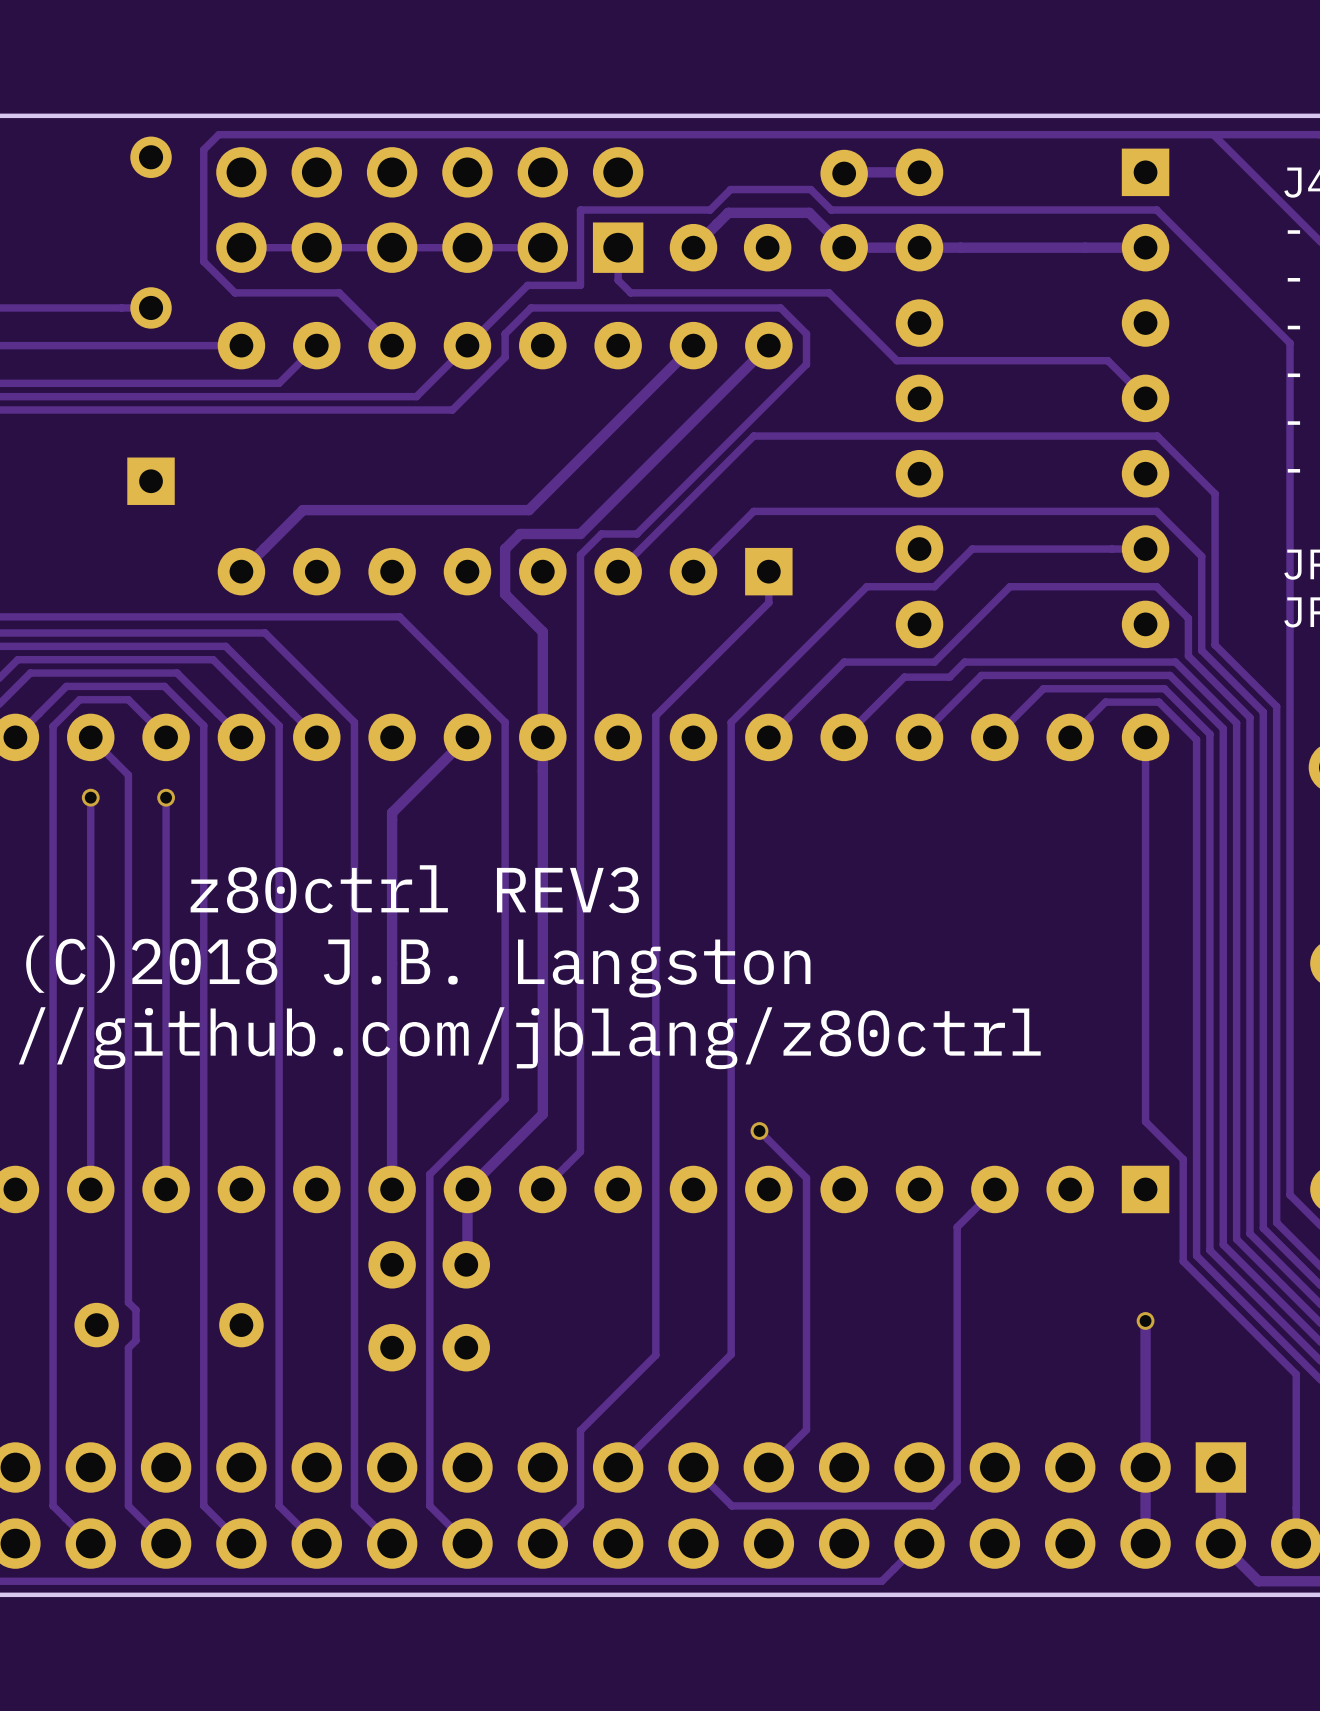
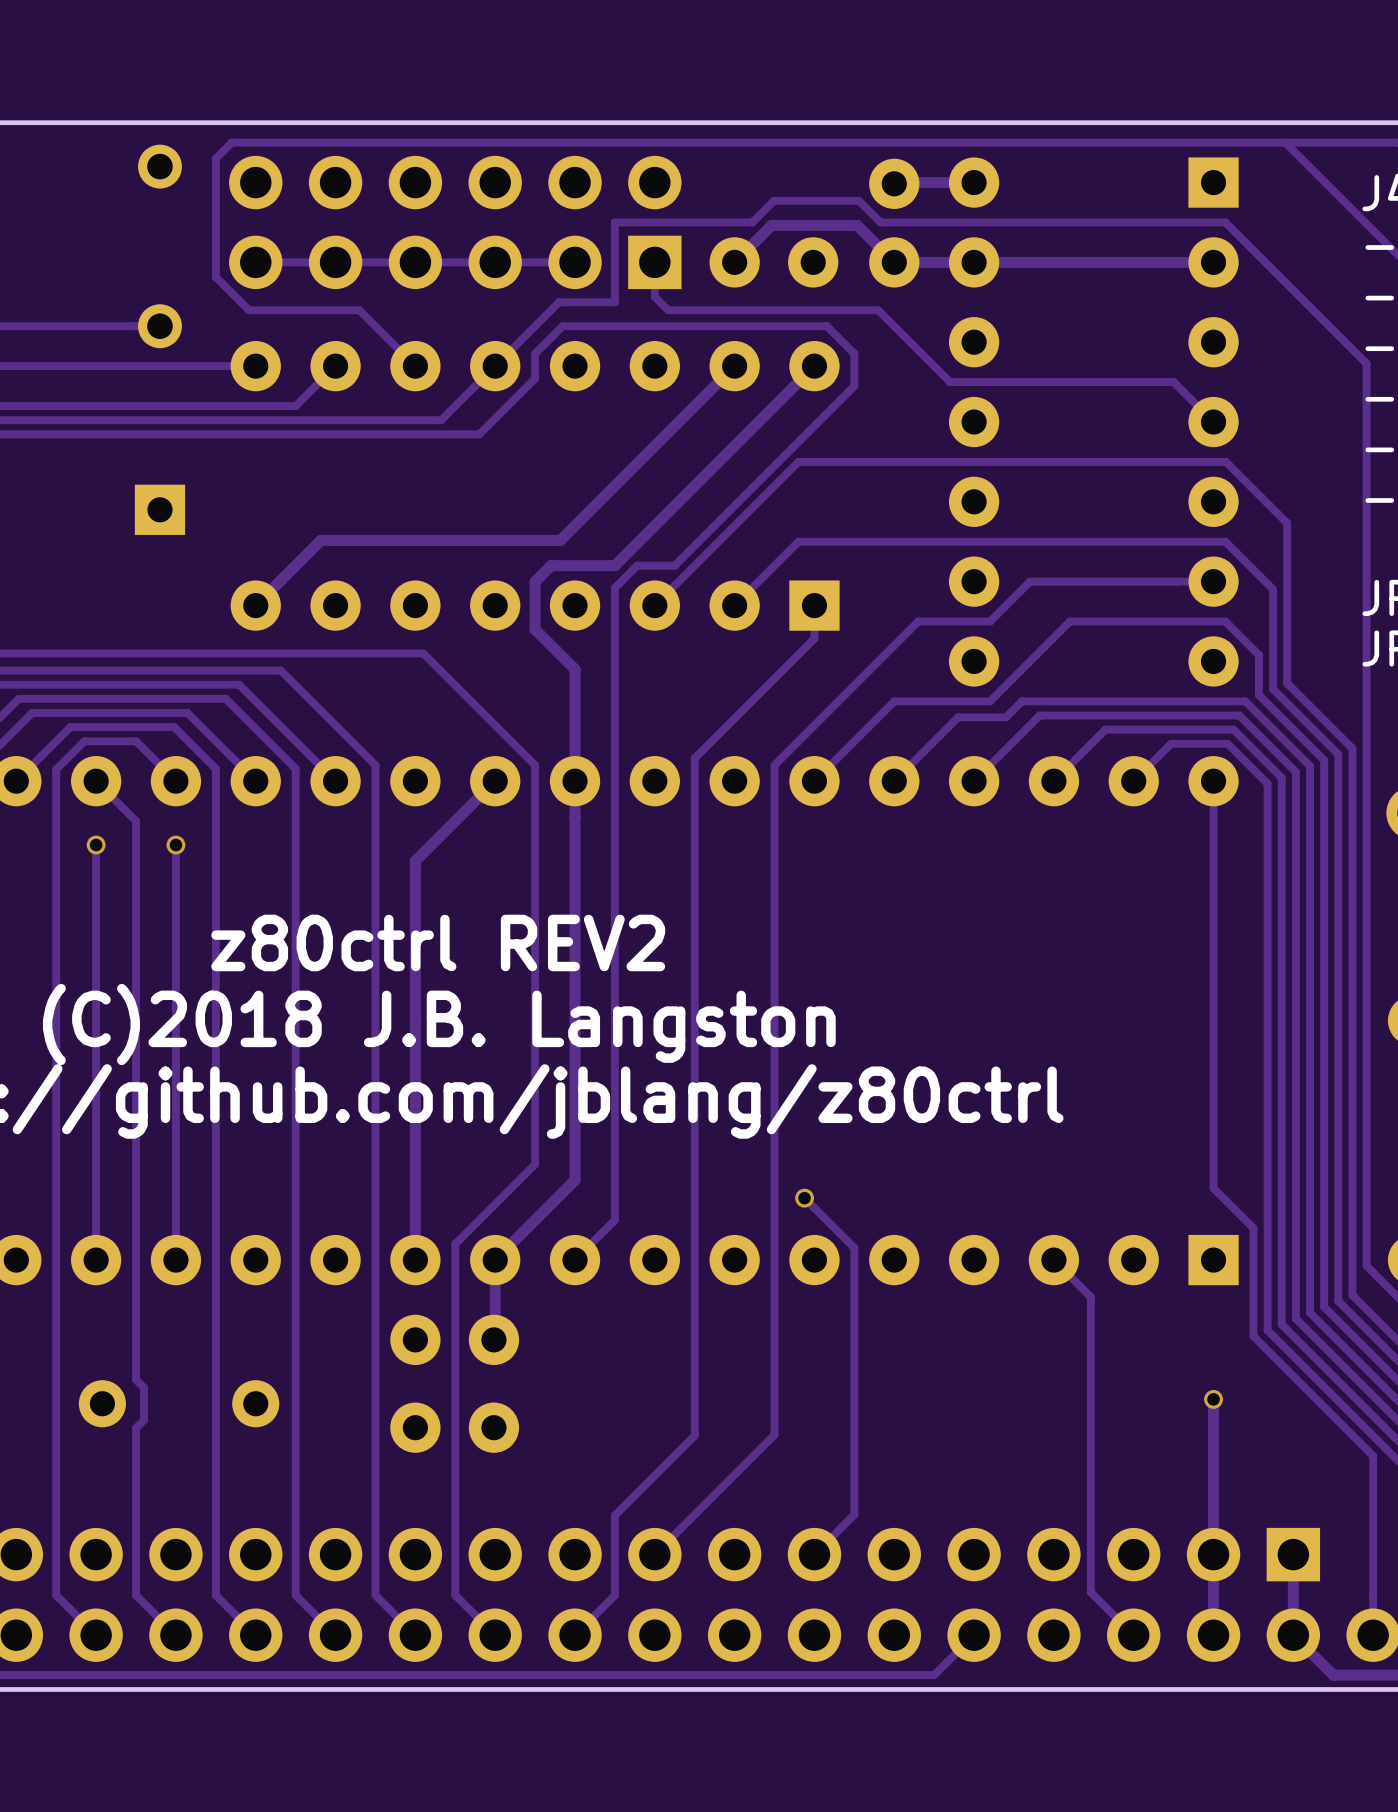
text: z80ctrl REV3 (414, 889) -> z80ctrl REV2 (438, 942)
track: (994, 1189) (957, 1227) (957, 1481) (932, 1505) (731, 1505) (693, 1467) -> (1053, 1260) (1090, 1297) (1090, 1592) (1133, 1635)

